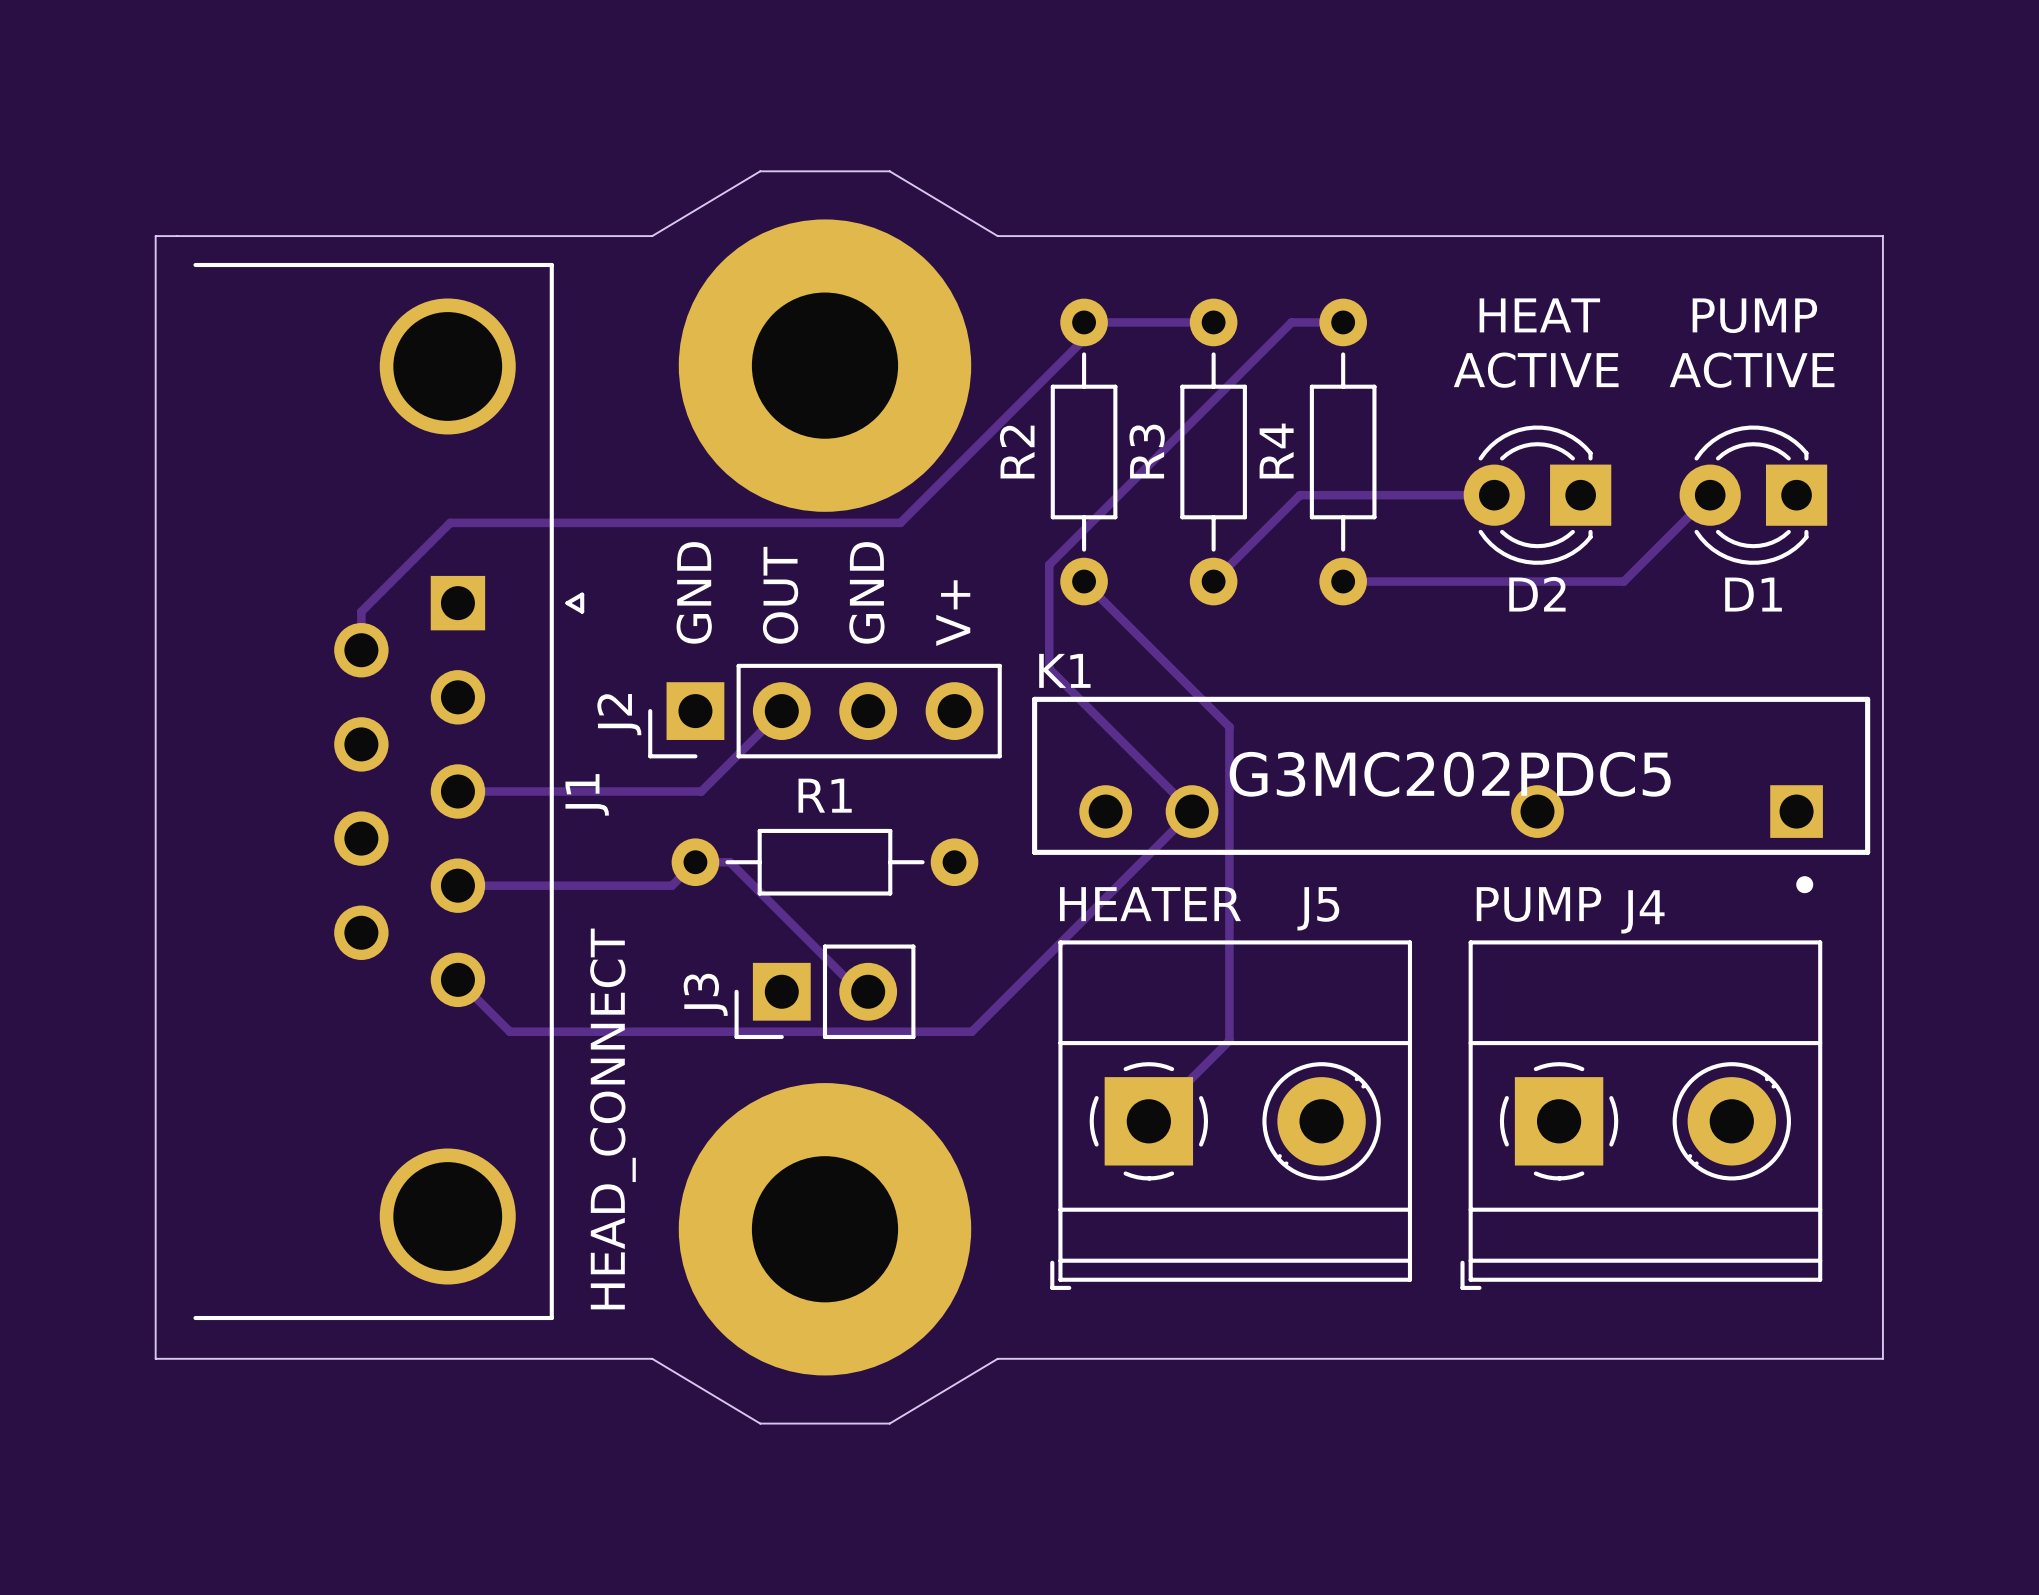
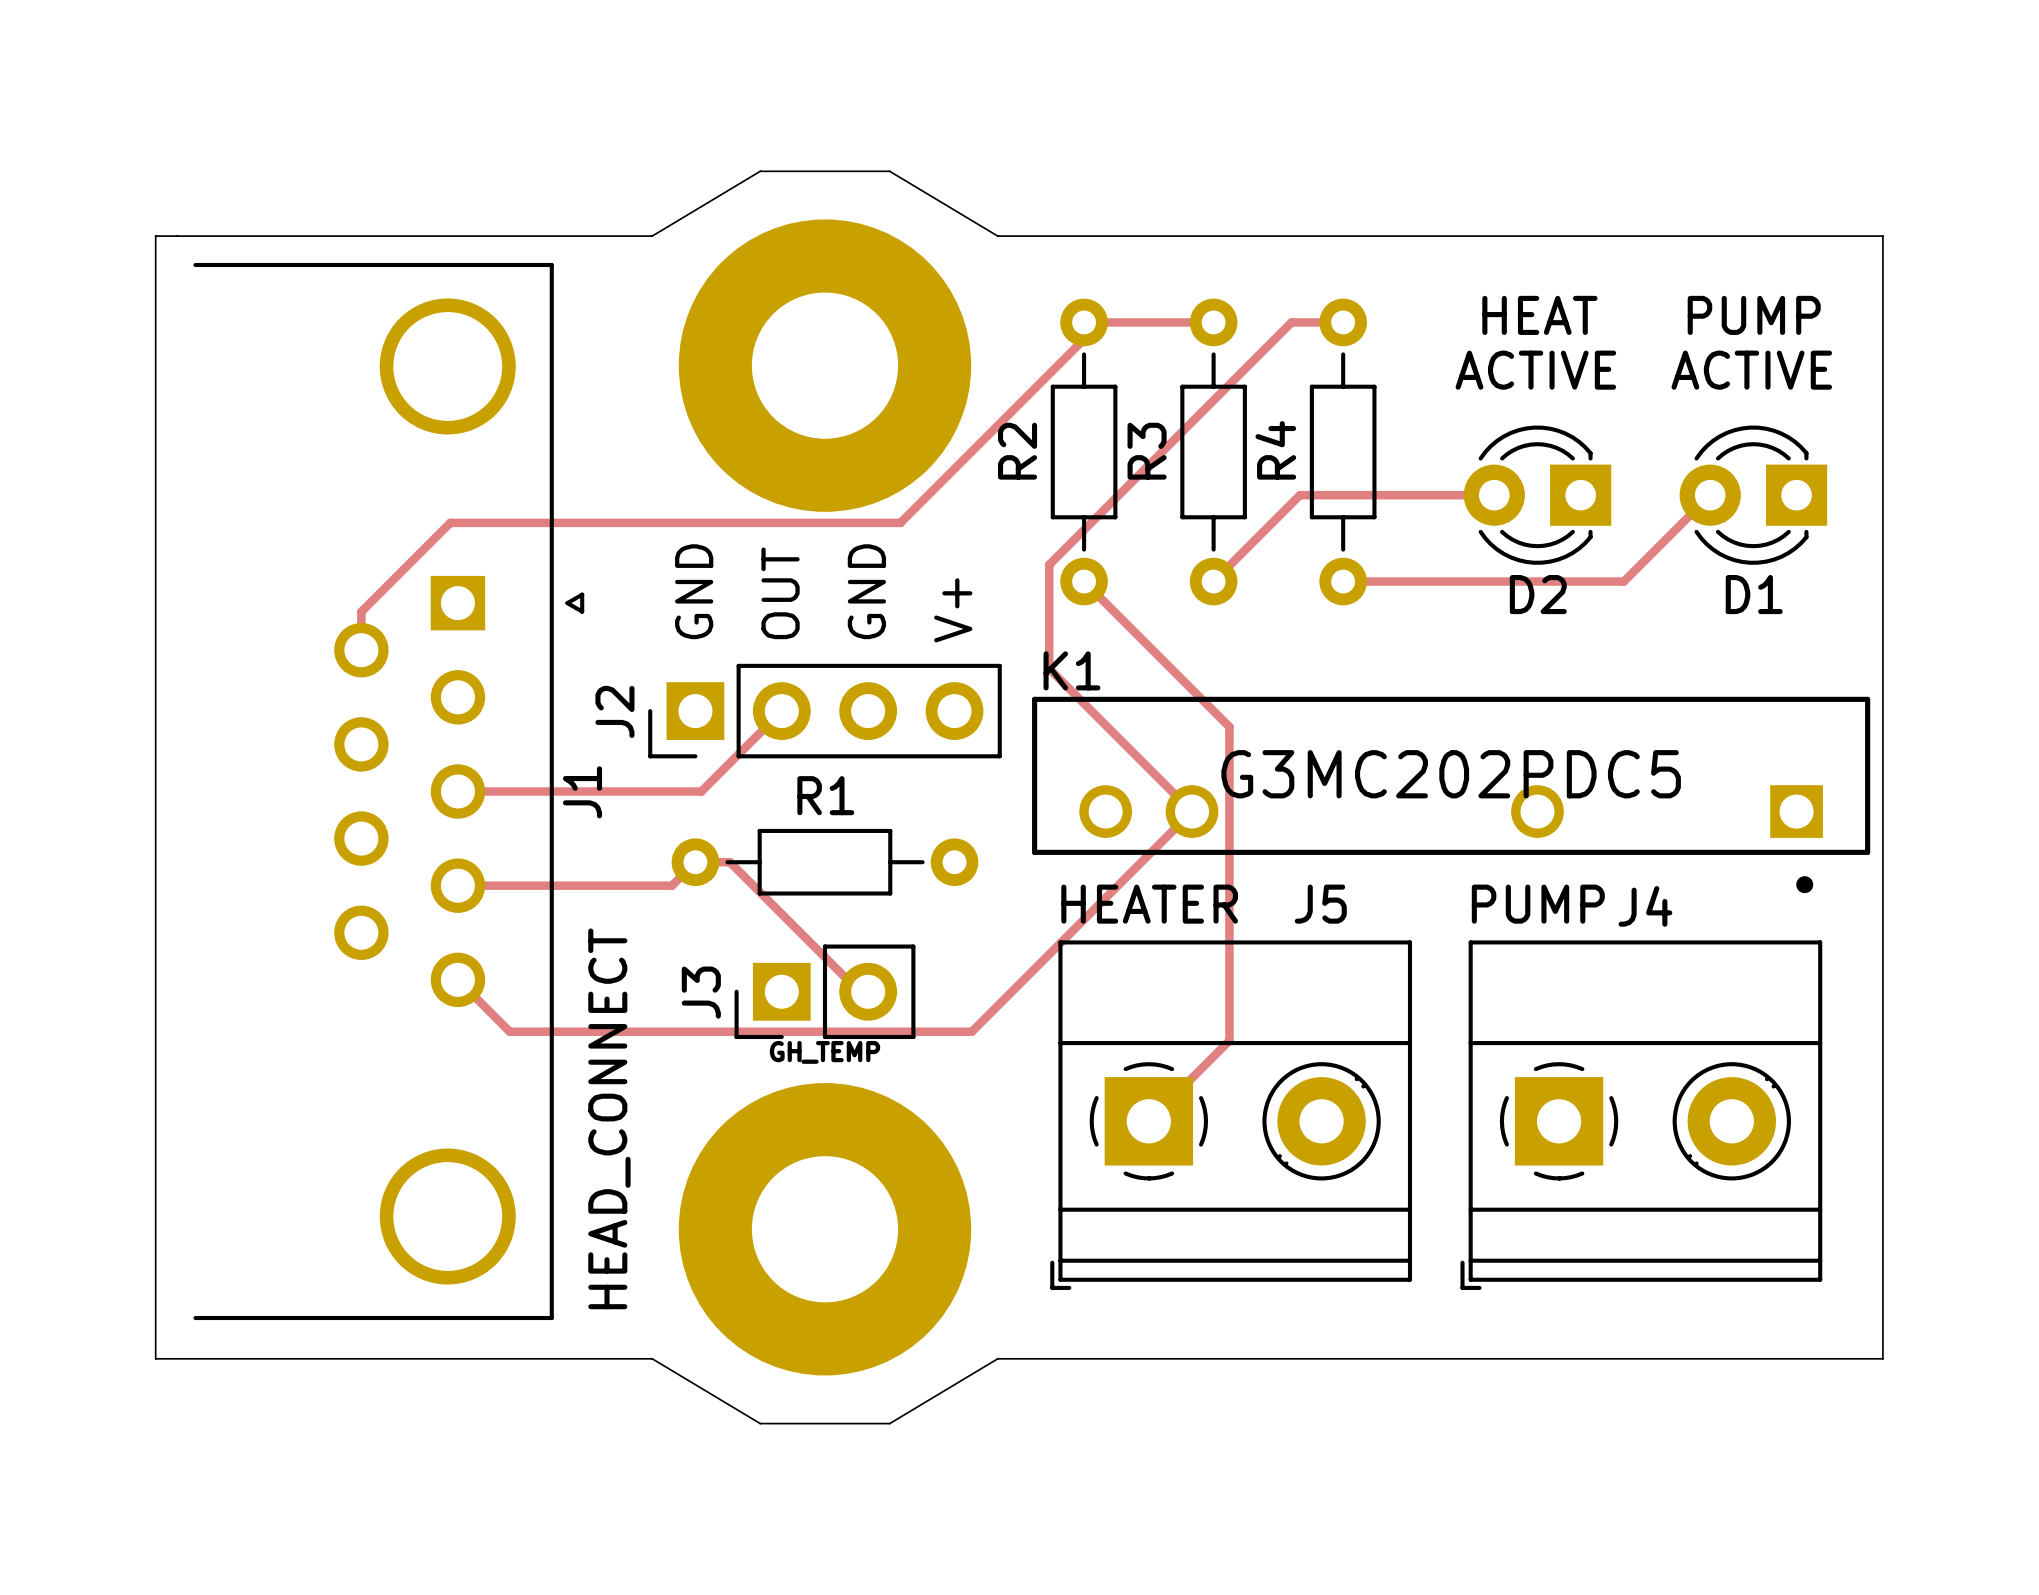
text: none -> GH_TEMP (824, 1052)

